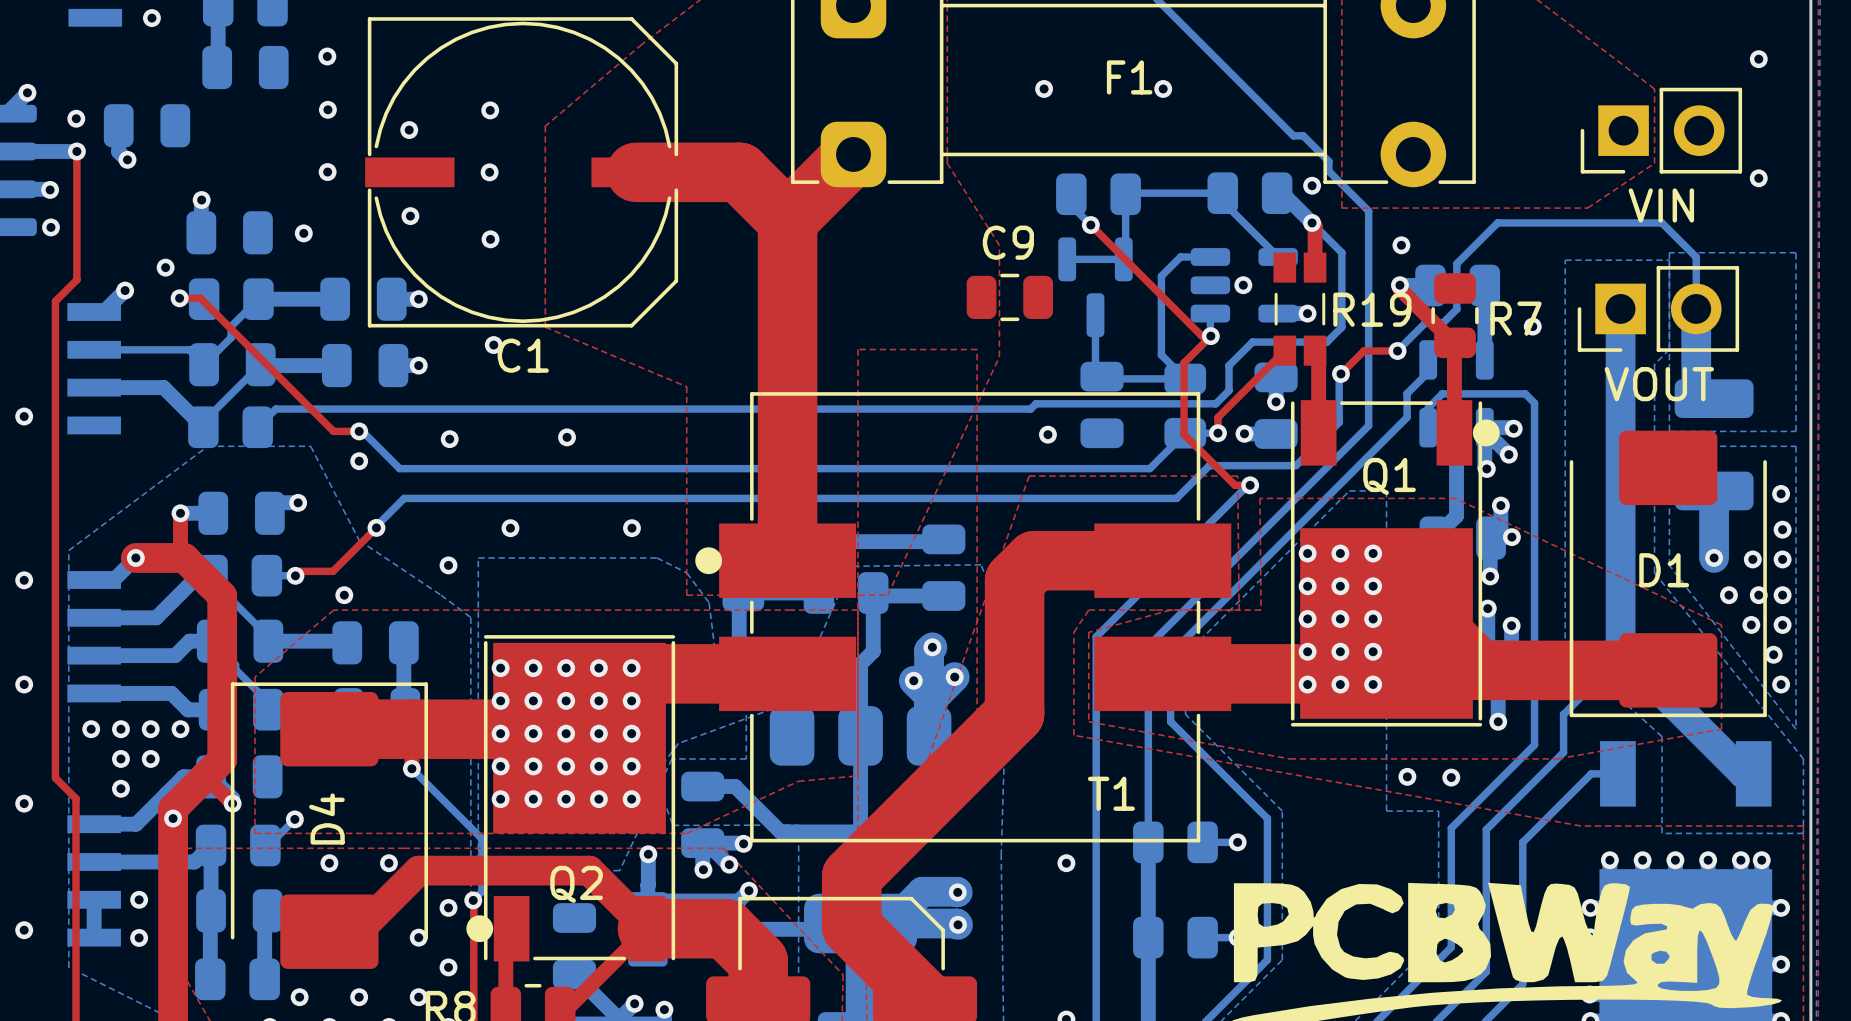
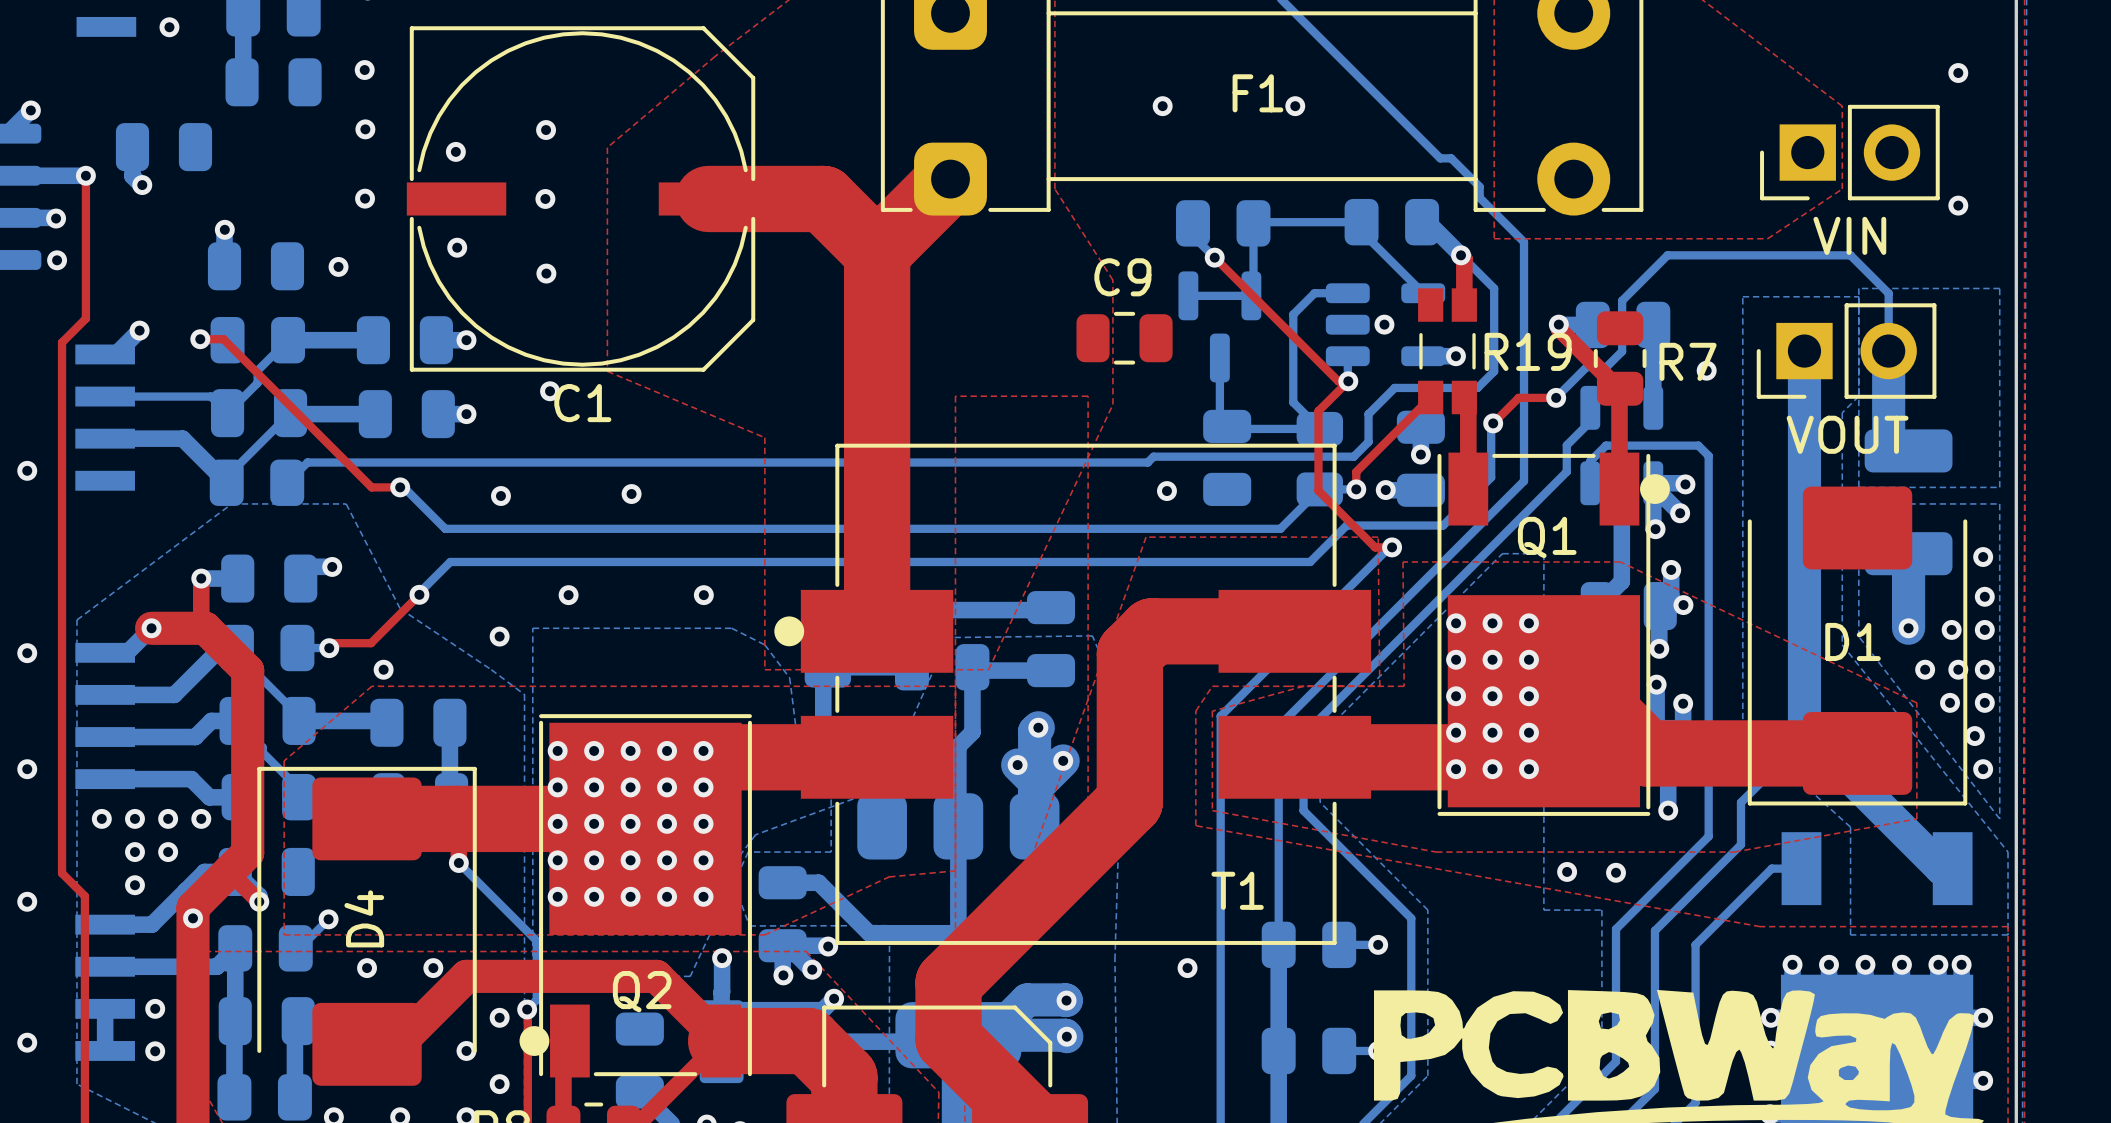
via: (76, 118) -> none
via: (1312, 185) -> none
via: (1401, 245) -> none
via: (165, 267) -> none
via: (359, 461) -> none

